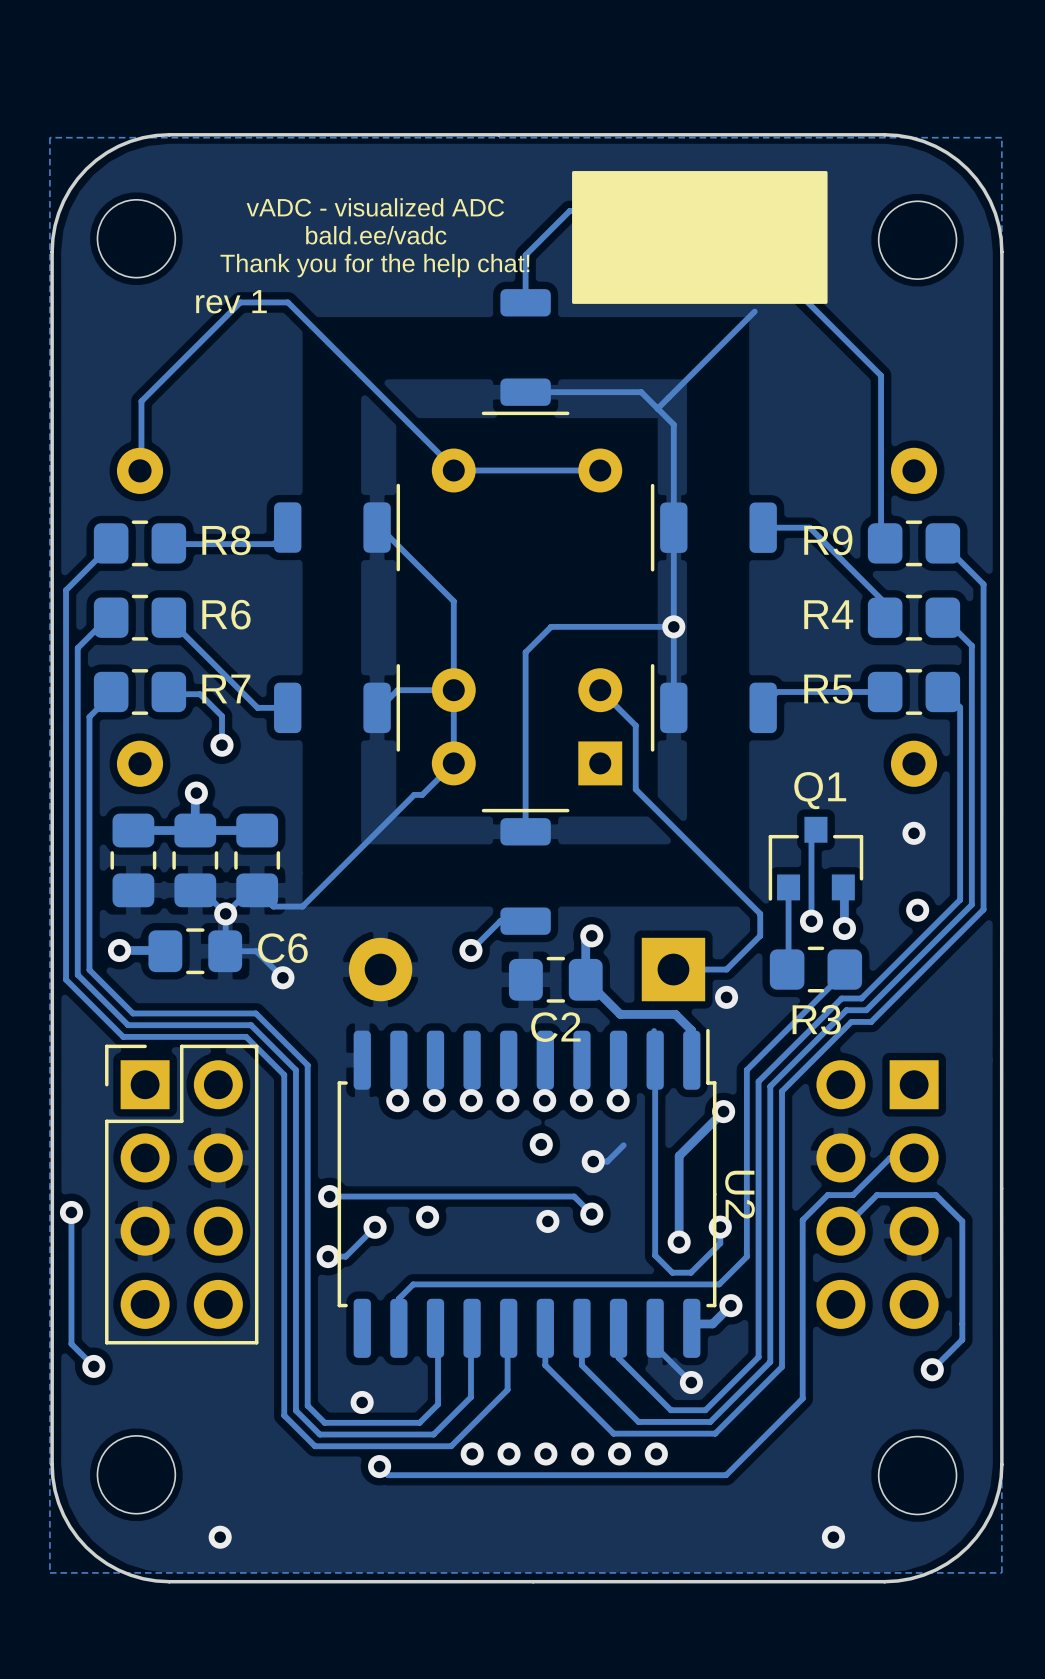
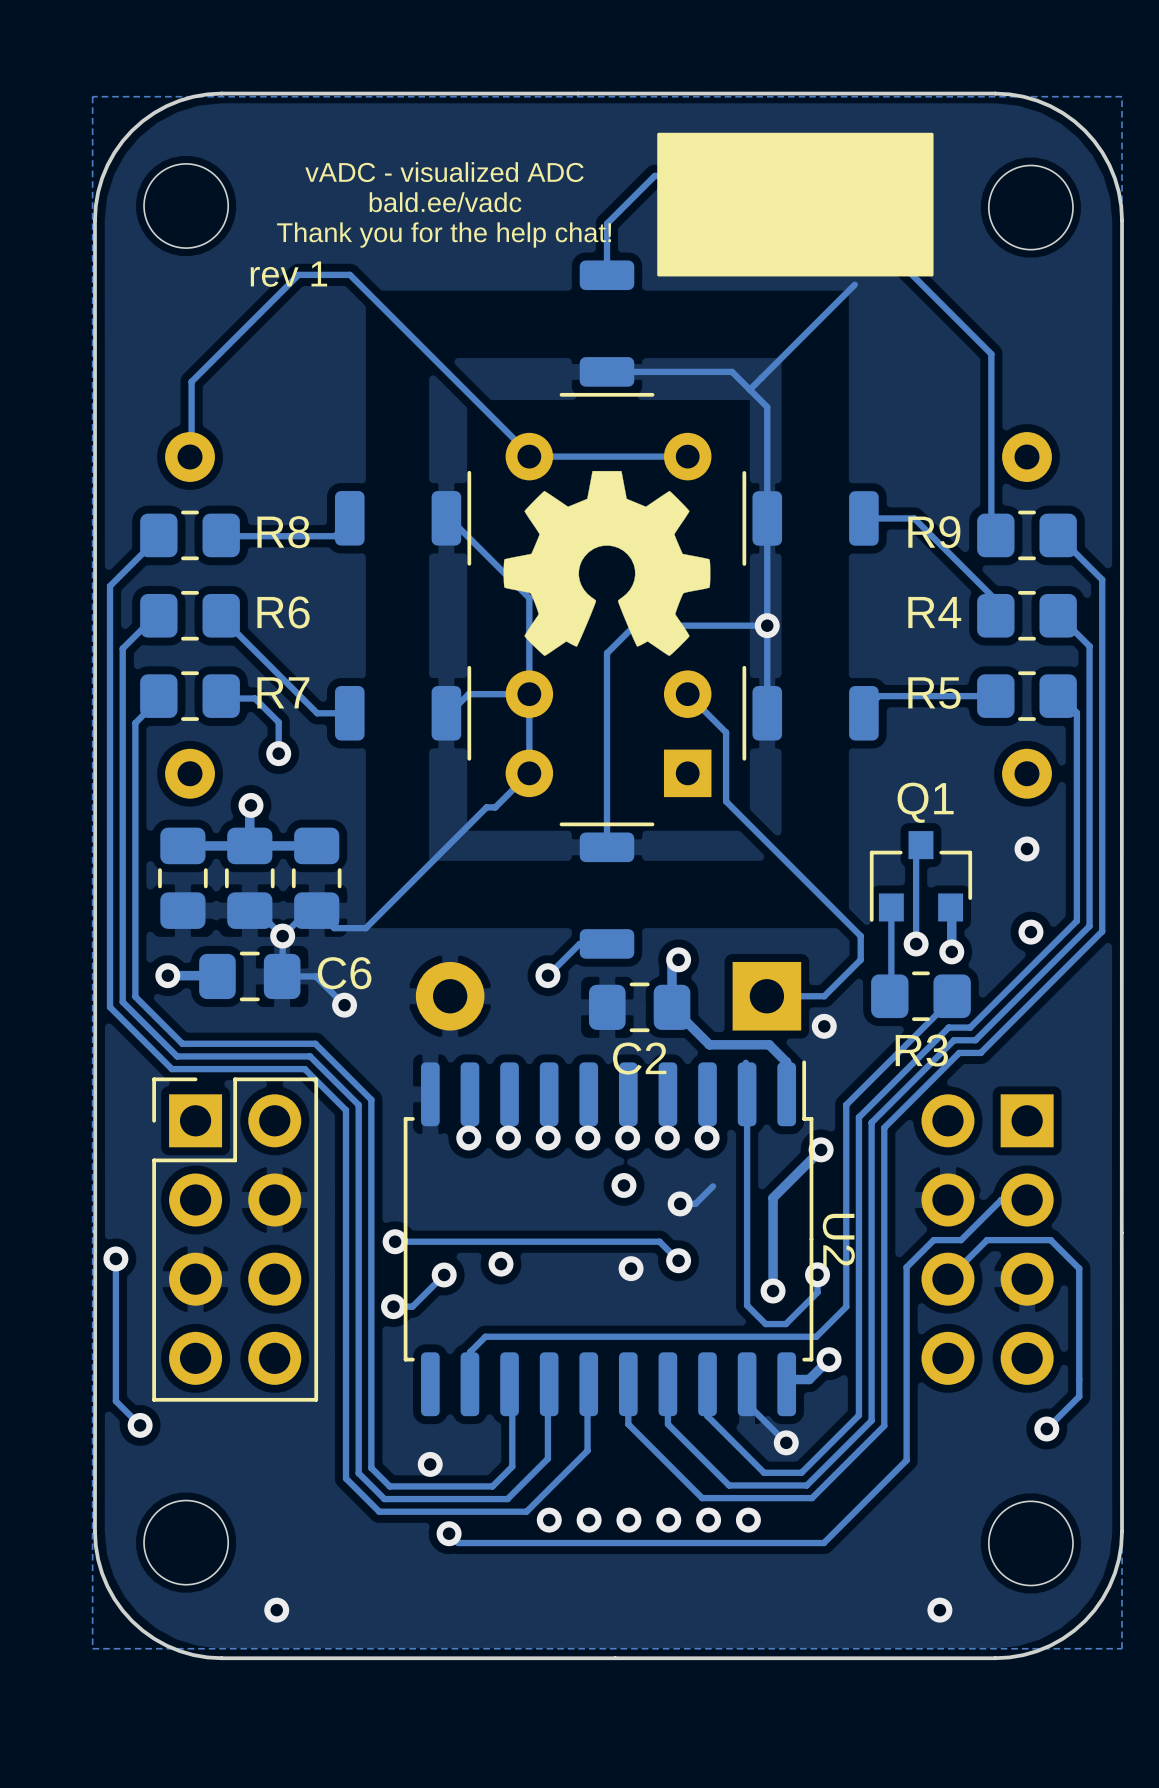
drawing: none -> [503, 470, 711, 656]

